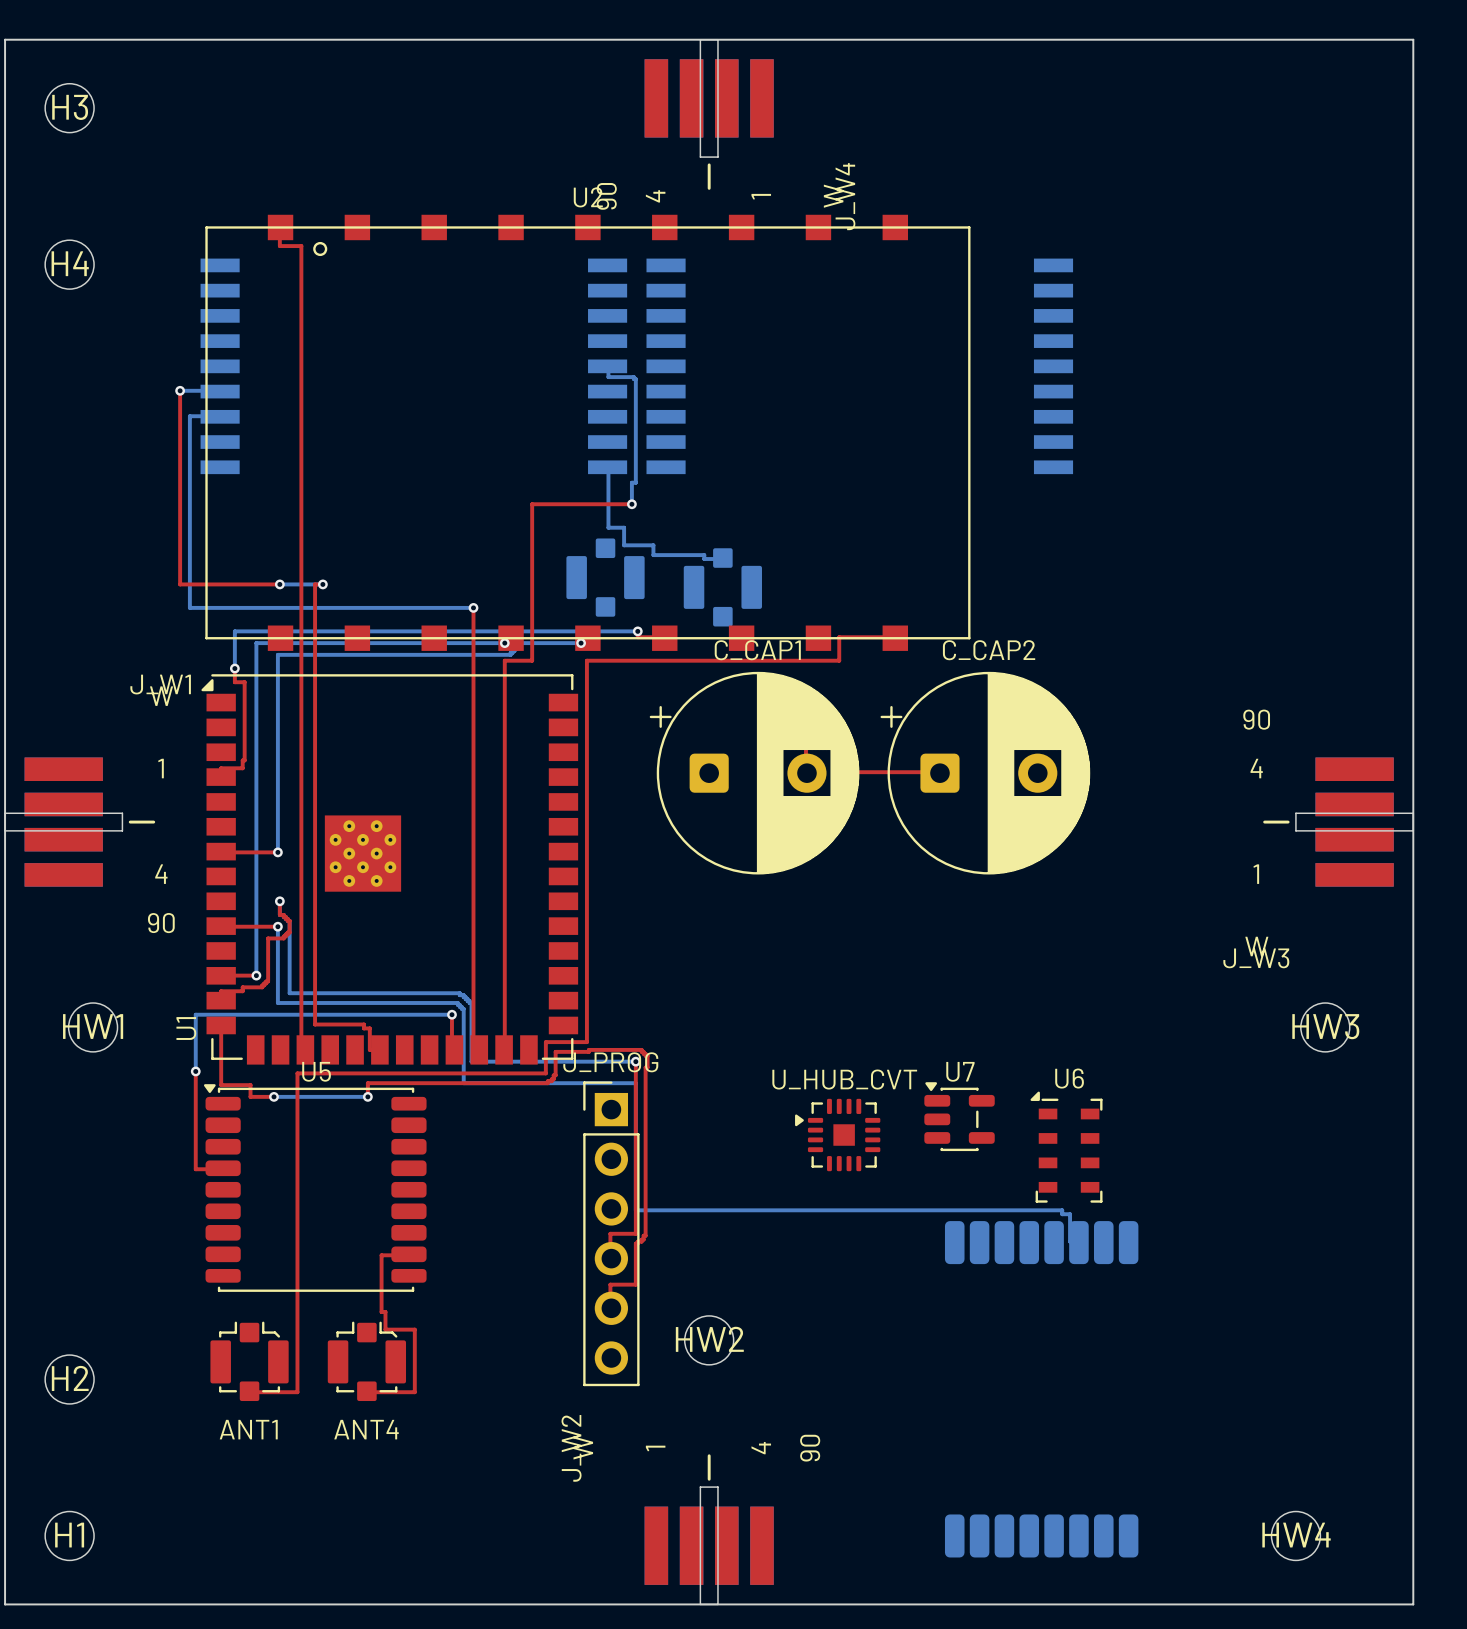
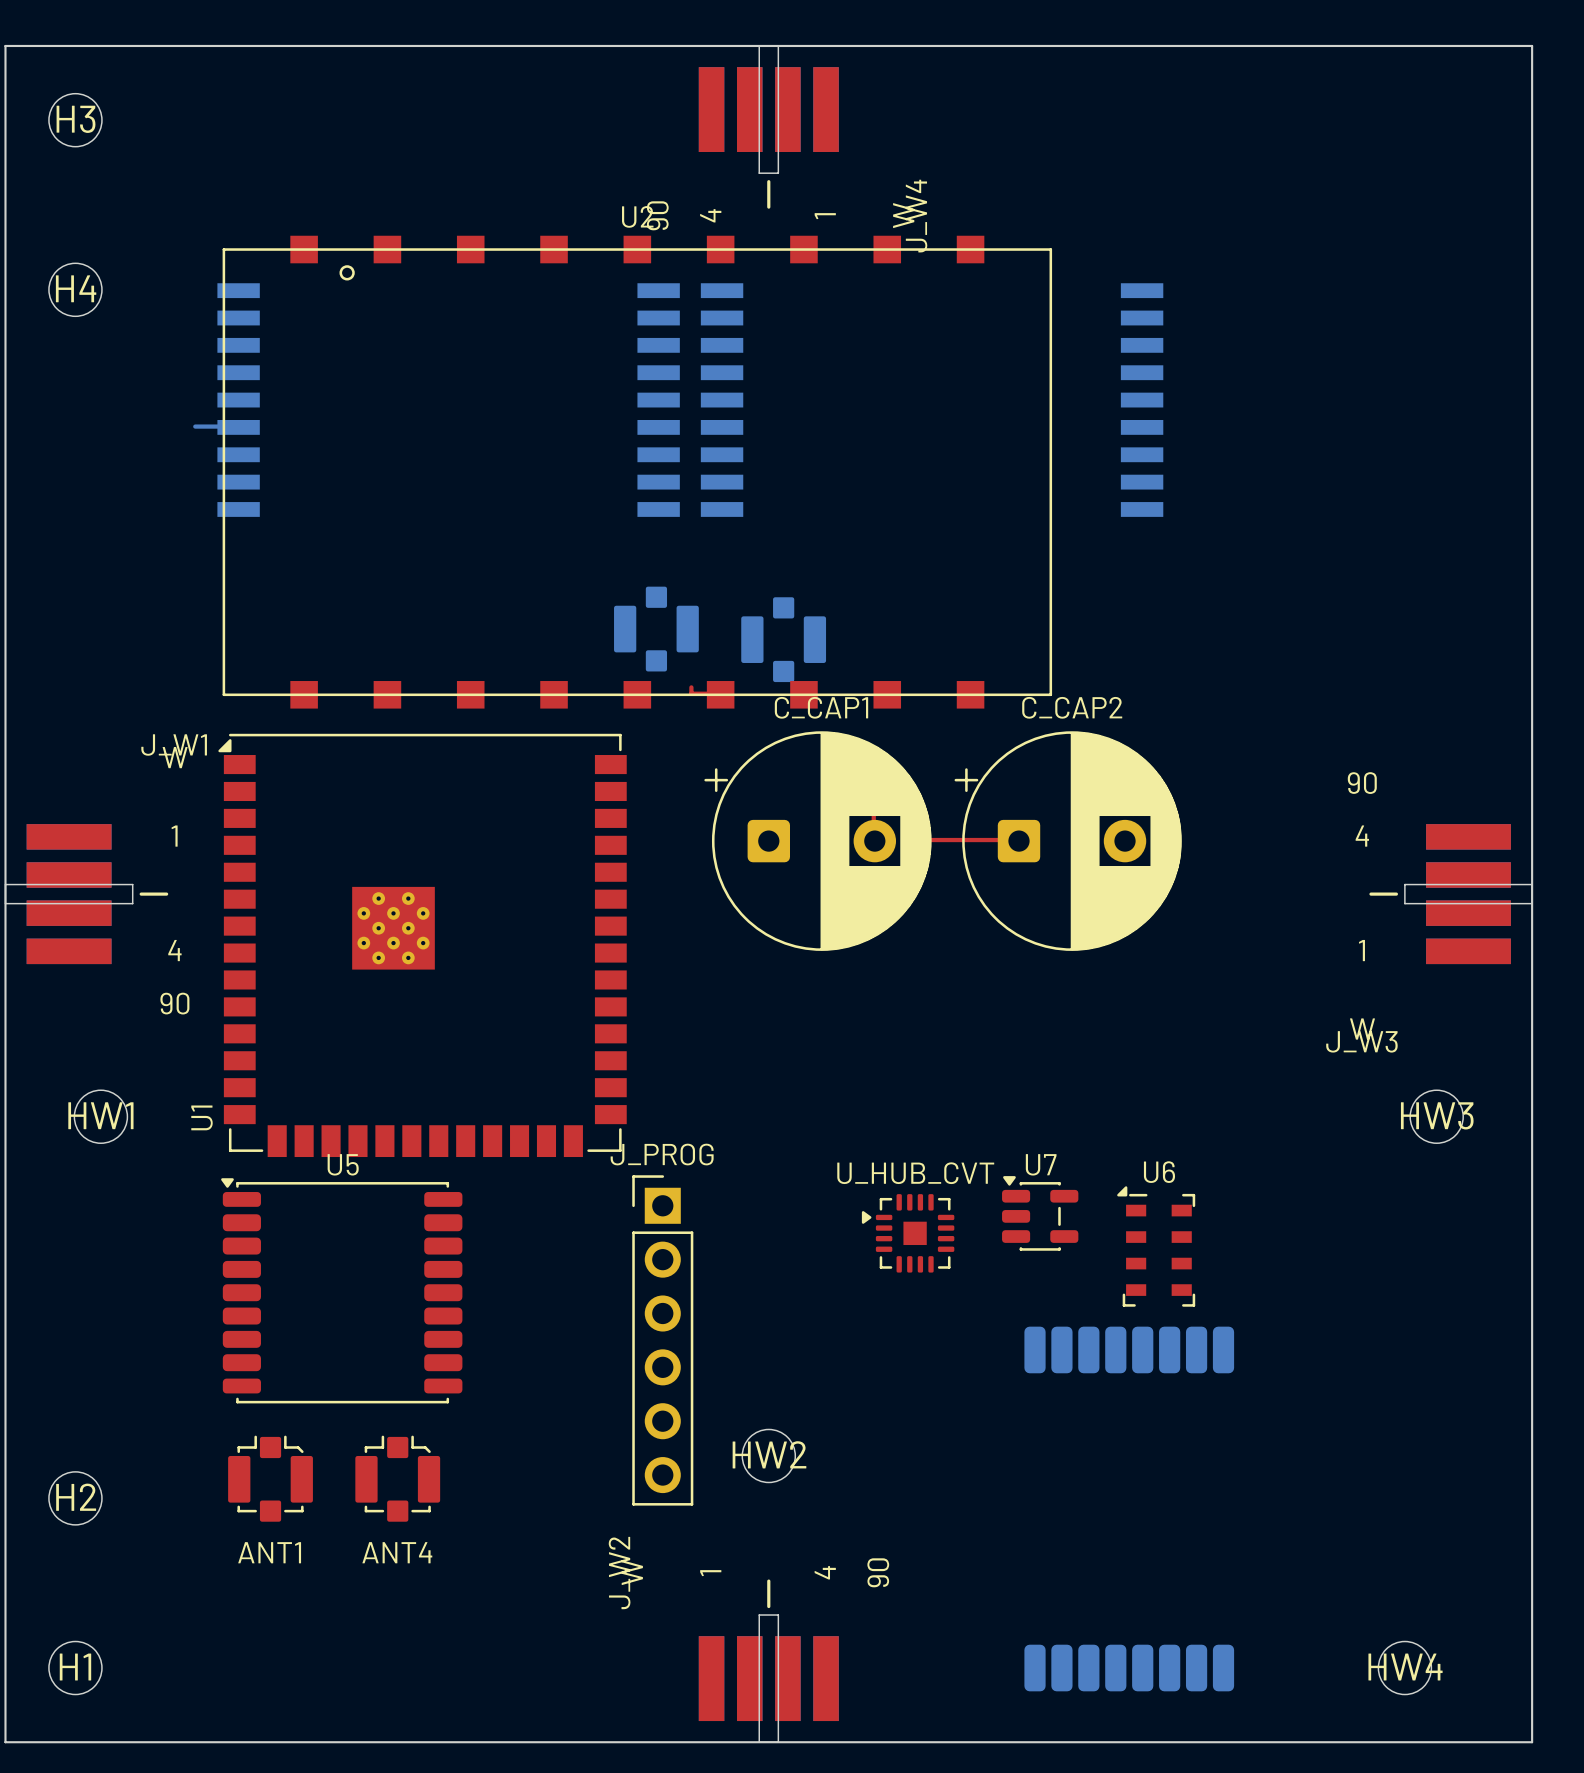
top track: (279, 226) (279, 246) (301, 246) (301, 1049) (305, 1049) -> none
bottom track: (608, 367) (608, 377) (633, 377) (635, 379) (635, 482) (631, 482) (631, 504) -> none
top track: (180, 390) (180, 584) (279, 584) -> none
via: (180, 390) -> none
bottom track: (219, 416) (189, 416) (189, 607) (473, 607) -> none
bottom track: (608, 467) (608, 527) (624, 527) (624, 545) (653, 545) (653, 555) (704, 555) (704, 559) (723, 559) -> none
top track: (631, 504) (532, 504) (532, 660) (504, 660) (504, 1049) -> none
via: (631, 504) -> none
bottom track: (279, 584) (322, 584) -> none
via: (279, 584) -> none
top track: (322, 584) (315, 584) (315, 1024) (363, 1024) (363, 1028) (369, 1028) (369, 1049) (379, 1049) -> none
via: (322, 584) -> none
top track: (473, 607) (473, 1049) (479, 1049) -> none
via: (473, 607) -> none
bottom track: (637, 631) (234, 631) (234, 668) -> none
via: (637, 631) -> none
top track: (895, 637) (839, 637) (839, 660) (586, 660) (586, 1042) (545, 1042) (545, 1073) (297, 1073) (297, 1392) (250, 1392) (250, 1390) -> none
bottom track: (504, 643) (256, 643) (256, 975) -> none
via: (504, 643) -> none
bottom track: (581, 643) (516, 643) (516, 648) (510, 654) (277, 654) (277, 852) -> none
via: (581, 643) -> none
top track: (234, 668) (234, 682) (244, 682) (244, 760) (242, 760) (242, 768) (221, 768) (221, 778) -> none
via: (234, 668) -> none
top track: (221, 852) (277, 852) -> none
via: (277, 852) -> none
top track: (279, 901) (279, 914) (283, 914) (289, 920) (289, 932) (283, 938) (268, 938) (268, 981) (262, 987) (242, 987) (242, 991) (221, 991) (221, 1001) -> none
bottom track: (279, 901) (279, 914) (283, 914) (289, 920) (289, 993) (459, 993) (459, 995) (463, 995) (471, 1002) (471, 1061) (635, 1061) -> none
via: (279, 901) -> none
top track: (221, 926) (277, 926) -> none
bottom track: (277, 926) (277, 1002) (457, 1002) (463, 1008) (463, 1083) (635, 1083) (635, 1210) (1062, 1210) (1062, 1214) (1070, 1214) (1070, 1241) (1079, 1241) -> none
via: (277, 926) -> none
top track: (221, 975) (256, 975) -> none
via: (256, 975) -> none
top track: (451, 1014) (451, 1049) (453, 1049) -> none
bottom track: (451, 1014) (195, 1014) (195, 1071) -> none
via: (451, 1014) -> none
top track: (221, 1024) (221, 1085) (250, 1085) (250, 1096) (273, 1096) -> none
top track: (635, 1061) (635, 1233) (610, 1233) (610, 1259) -> none
via: (635, 1061) -> none
top track: (195, 1071) (195, 1169) (223, 1169) -> none
via: (195, 1071) -> none
bottom track: (273, 1096) (367, 1096) -> none
via: (273, 1096) -> none
top track: (367, 1096) (367, 1083) (547, 1083) (555, 1075) (555, 1051) (641, 1049) (647, 1055) (647, 1067) (645, 1067) (645, 1235) (643, 1235) (641, 1241) (635, 1243) (635, 1284) (610, 1284) (610, 1308) -> none
via: (367, 1096) -> none
top track: (408, 1255) (381, 1255) (381, 1312) (385, 1312) (385, 1329) (414, 1329) (414, 1392) (367, 1392) (367, 1390) -> none

